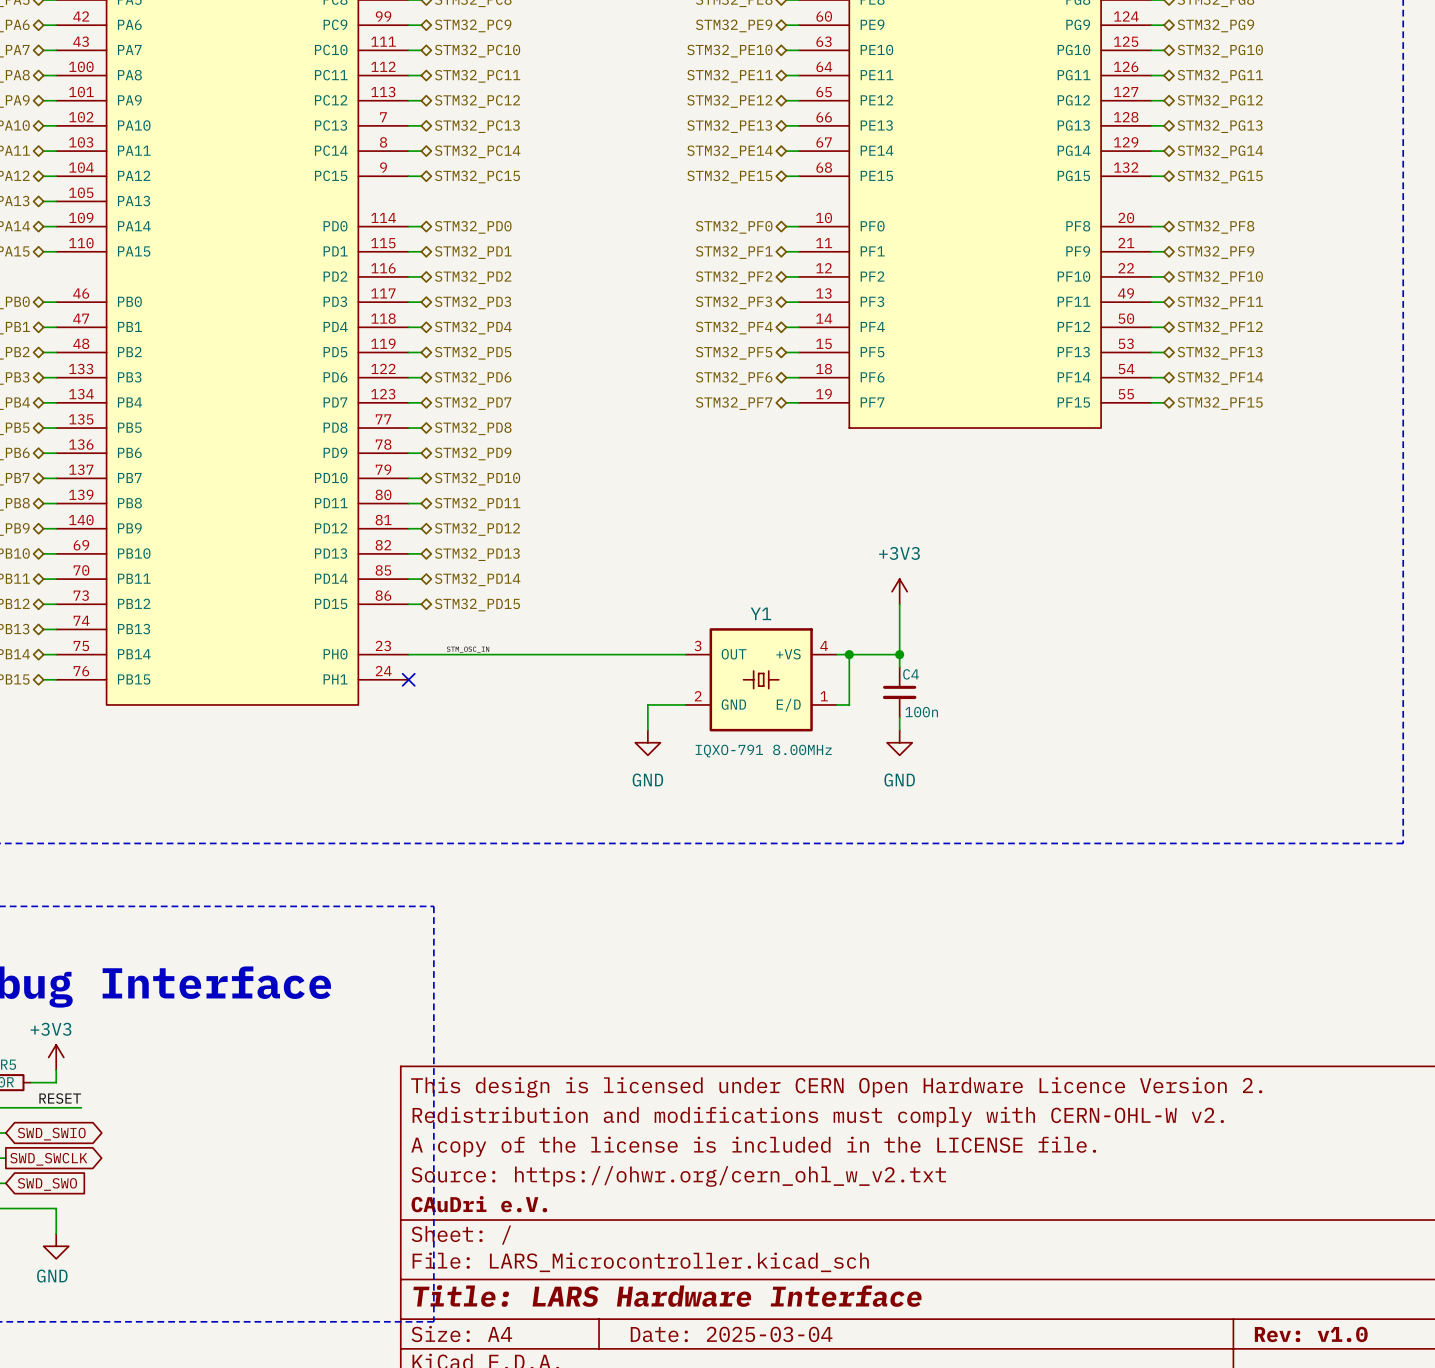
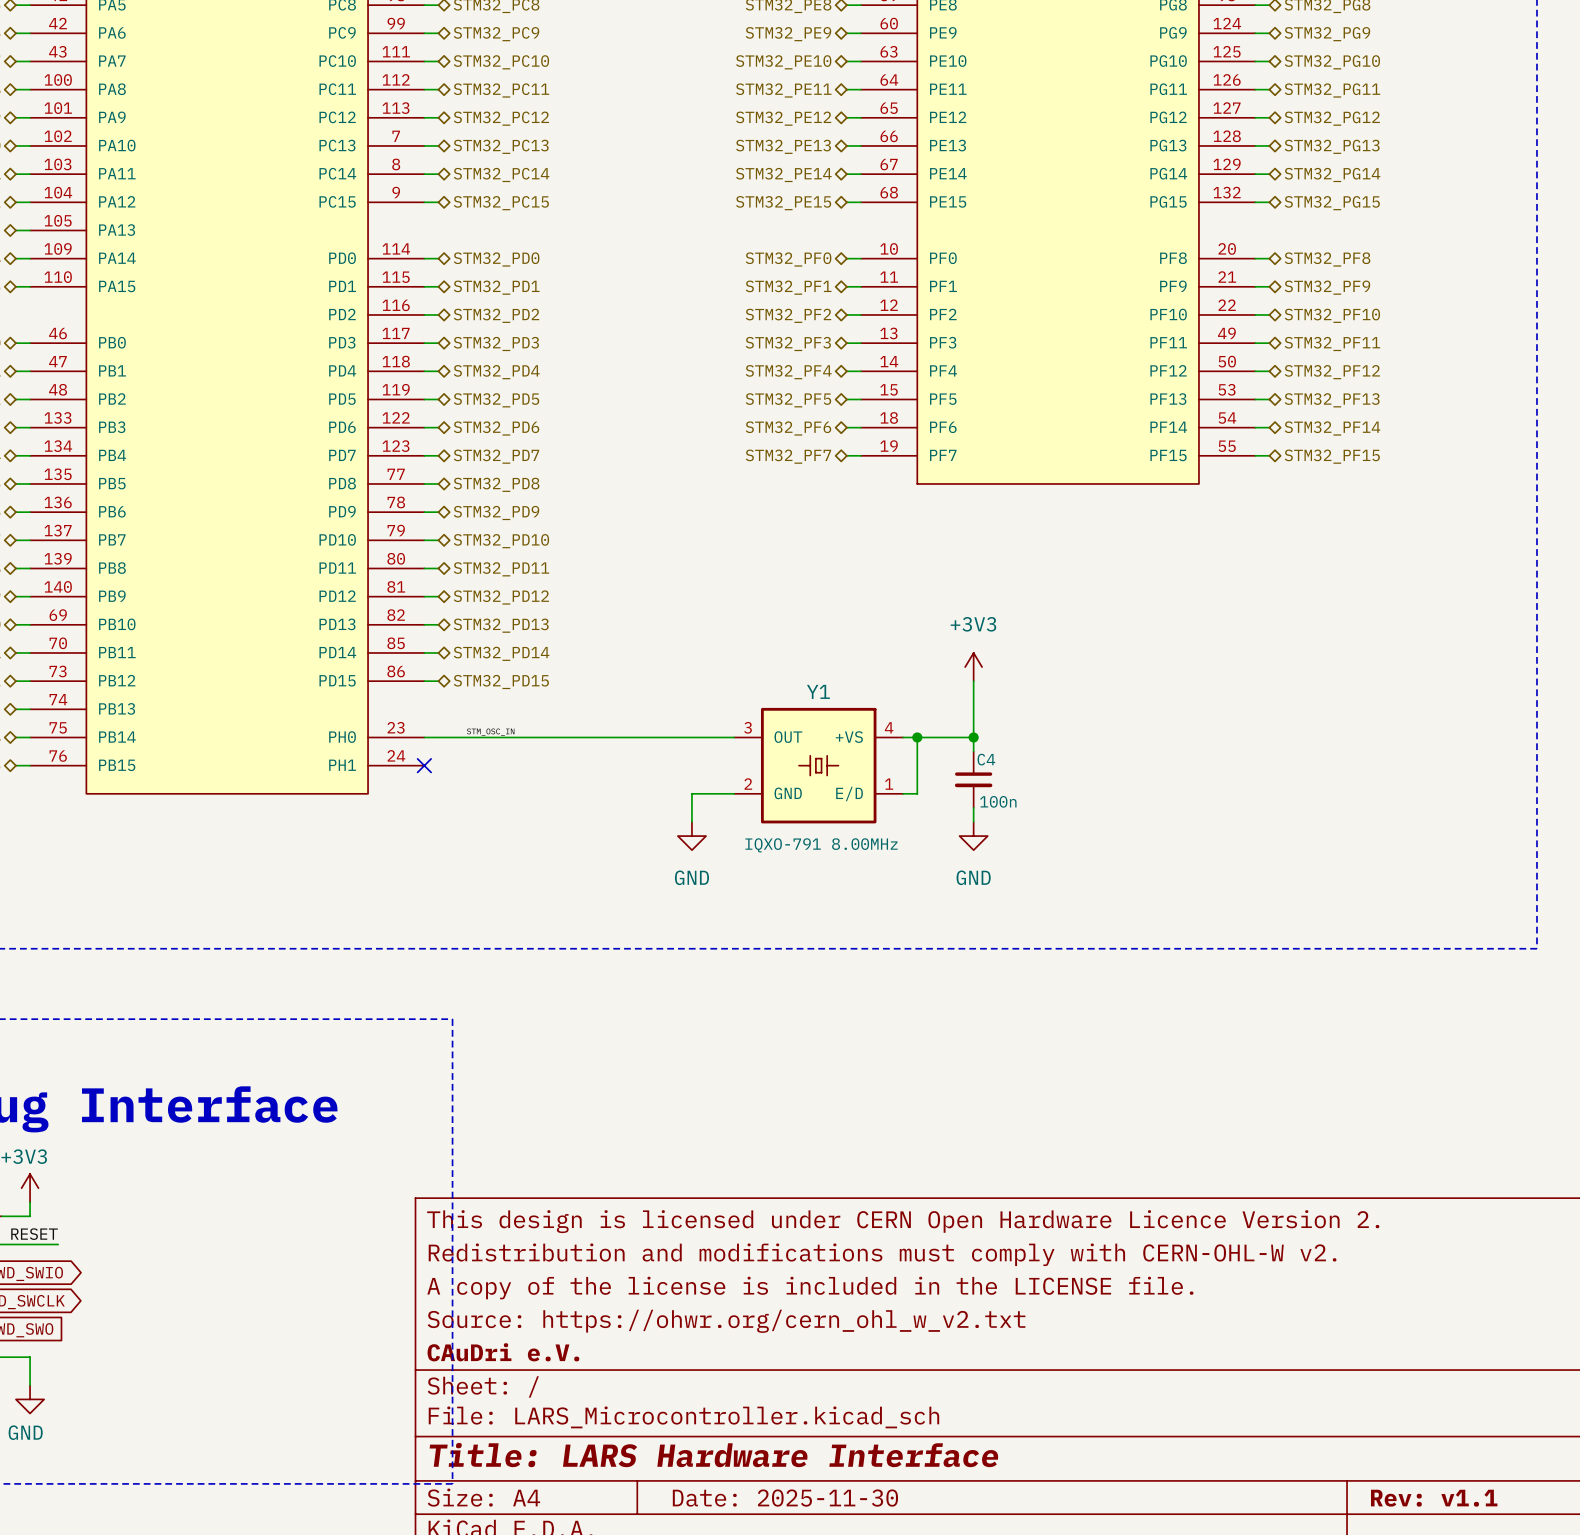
title block: Date: 2025-03-04 (731, 1334) -> Date: 2025-11-30 (785, 1498)
title block: Rev: v1.0 (1311, 1334) -> Rev: v1.1 (1434, 1498)

